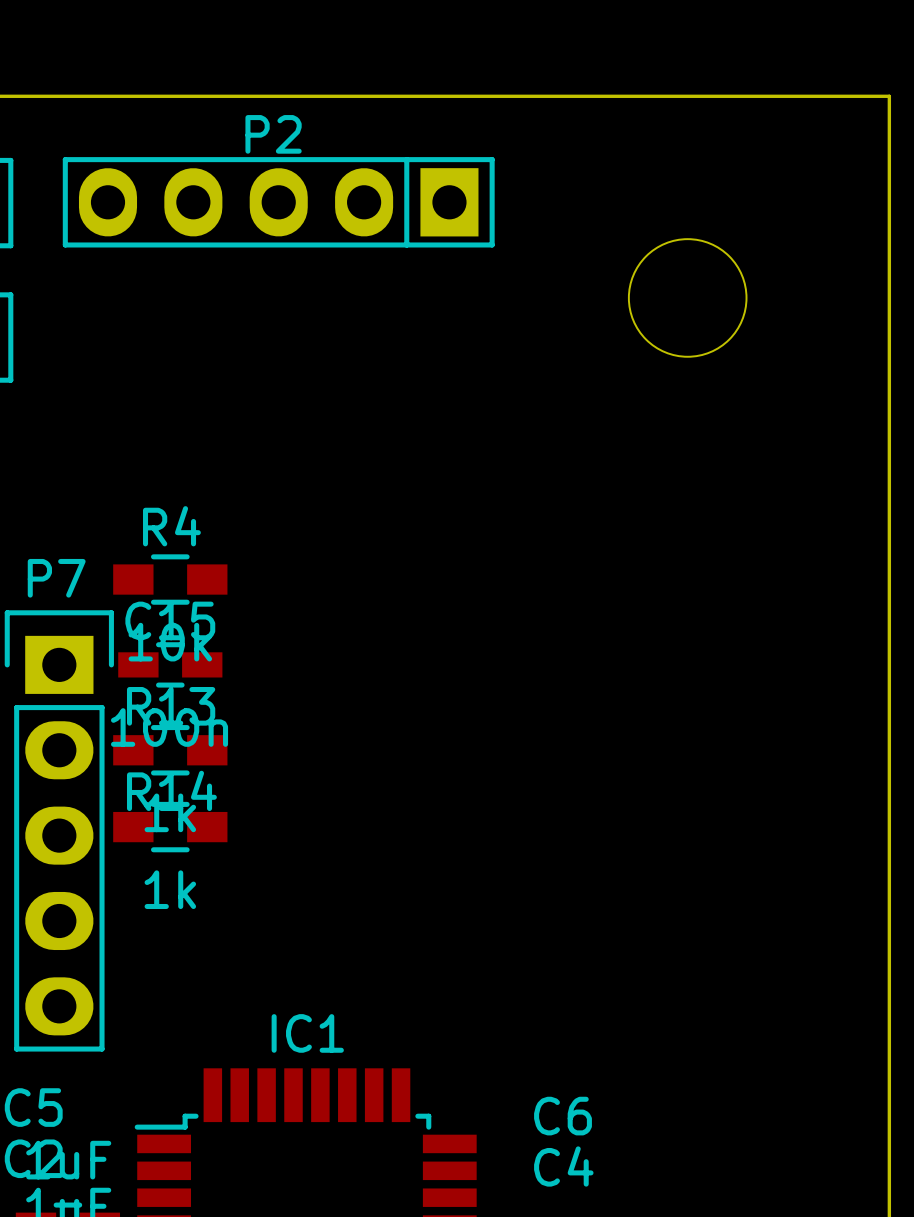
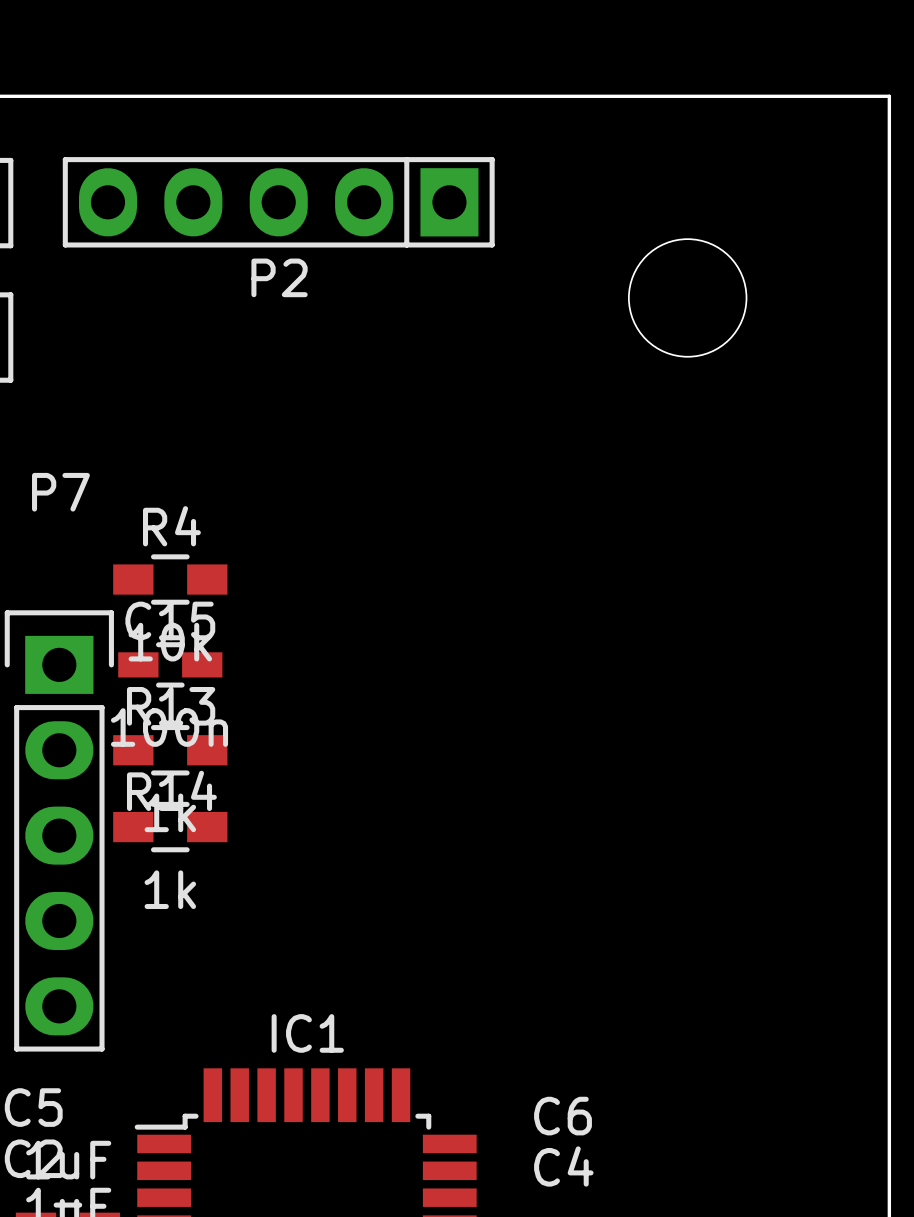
P2 name position: P2 (273, 134) -> P2 (279, 277)
P7 name position: P7 (56, 578) -> P7 (60, 492)

